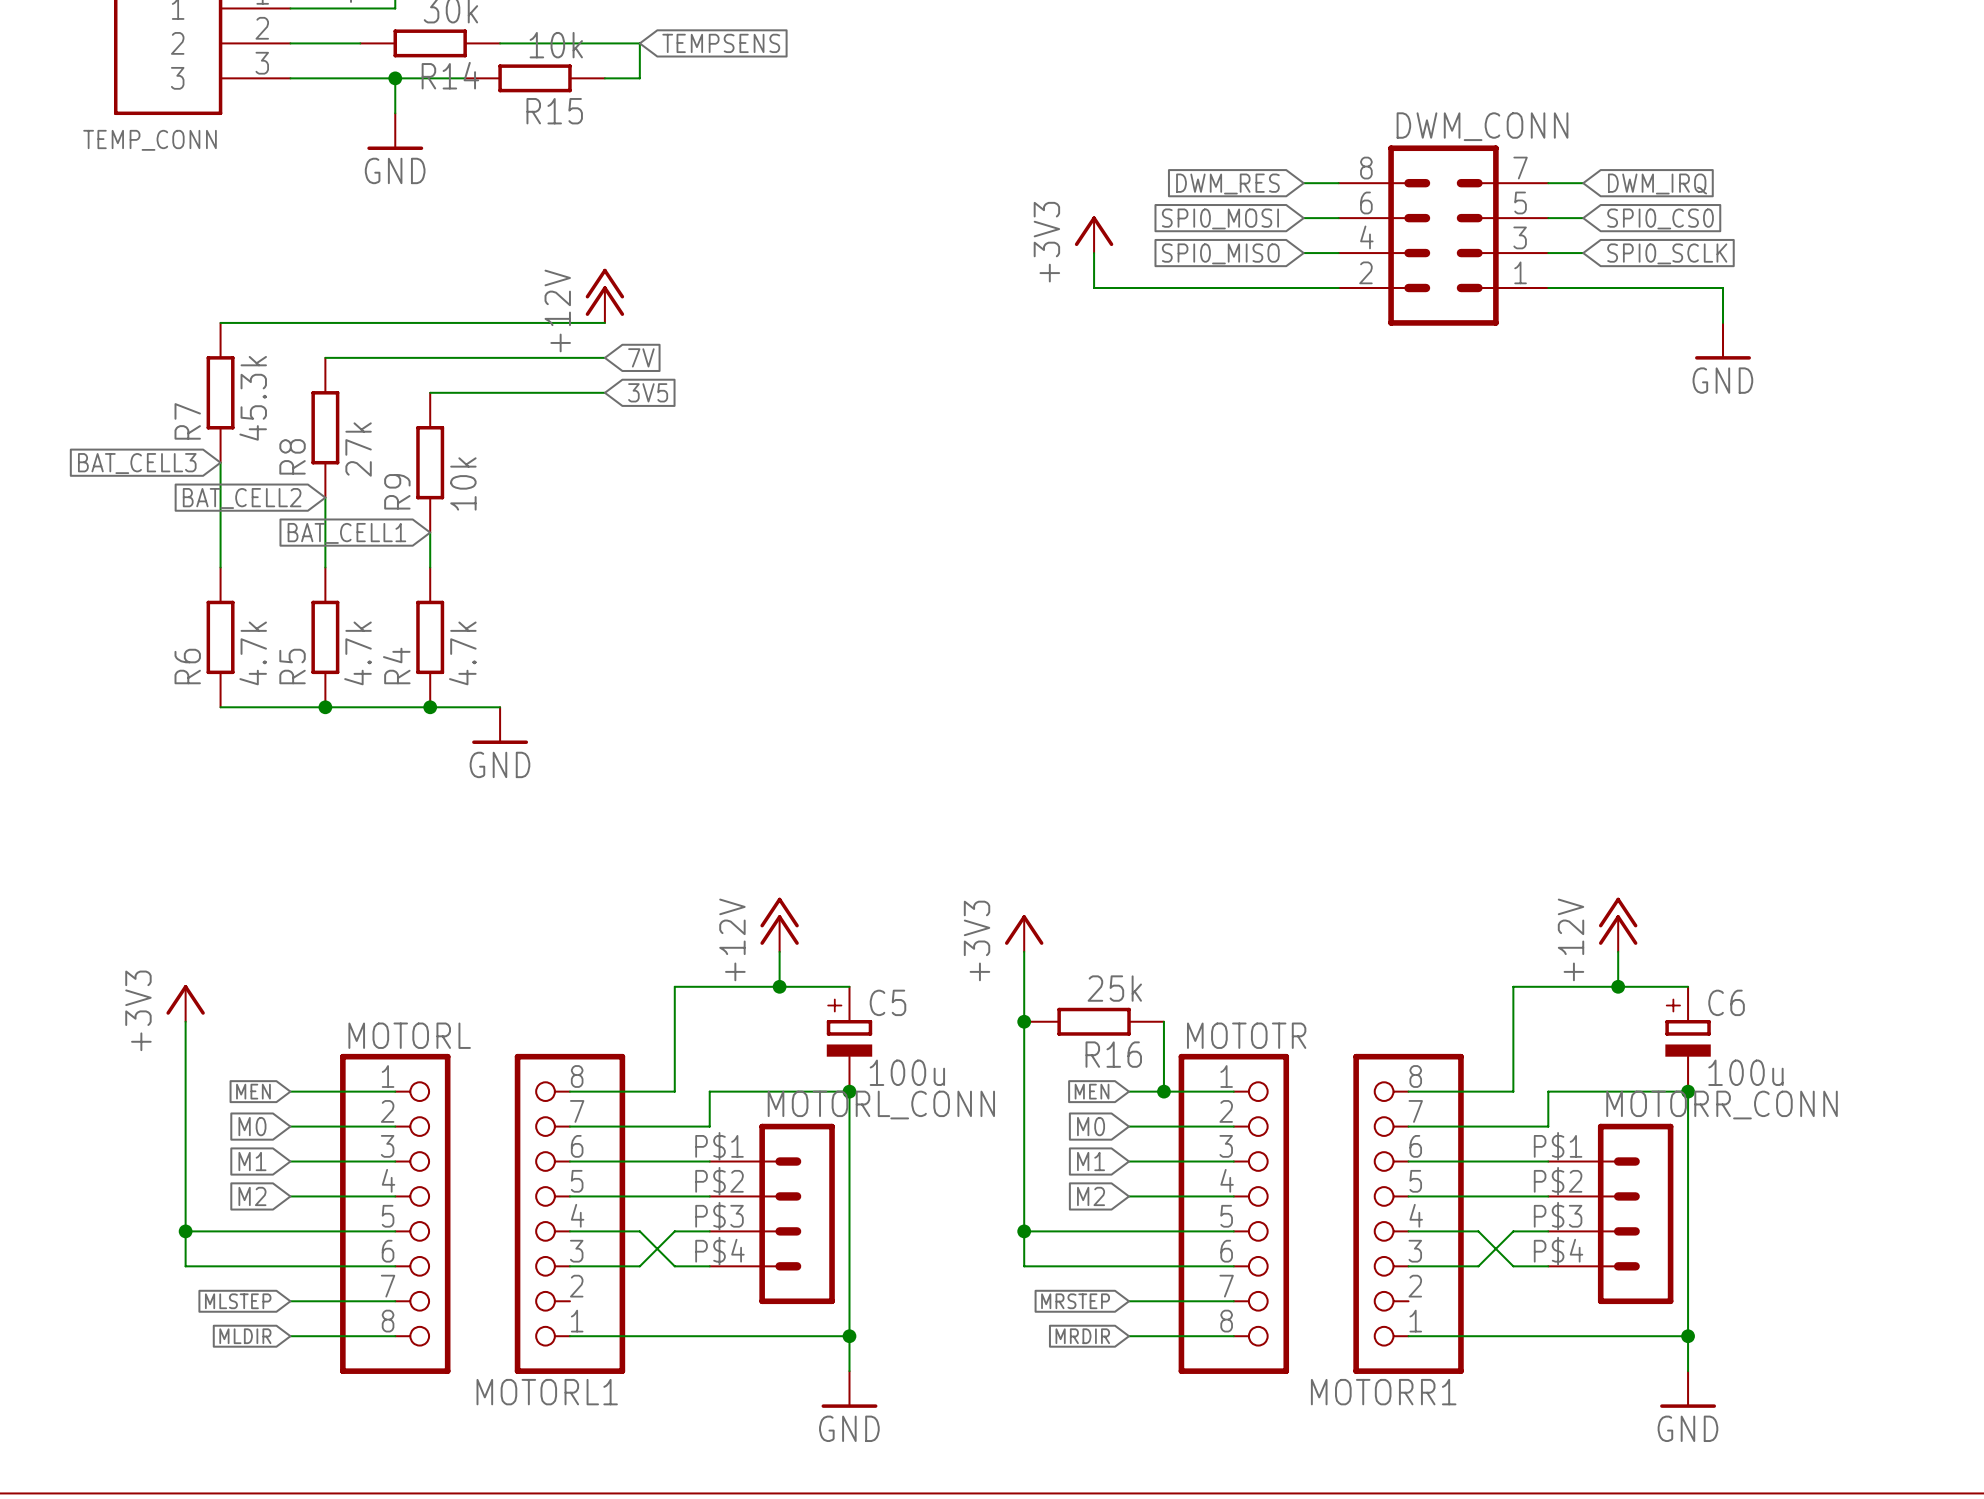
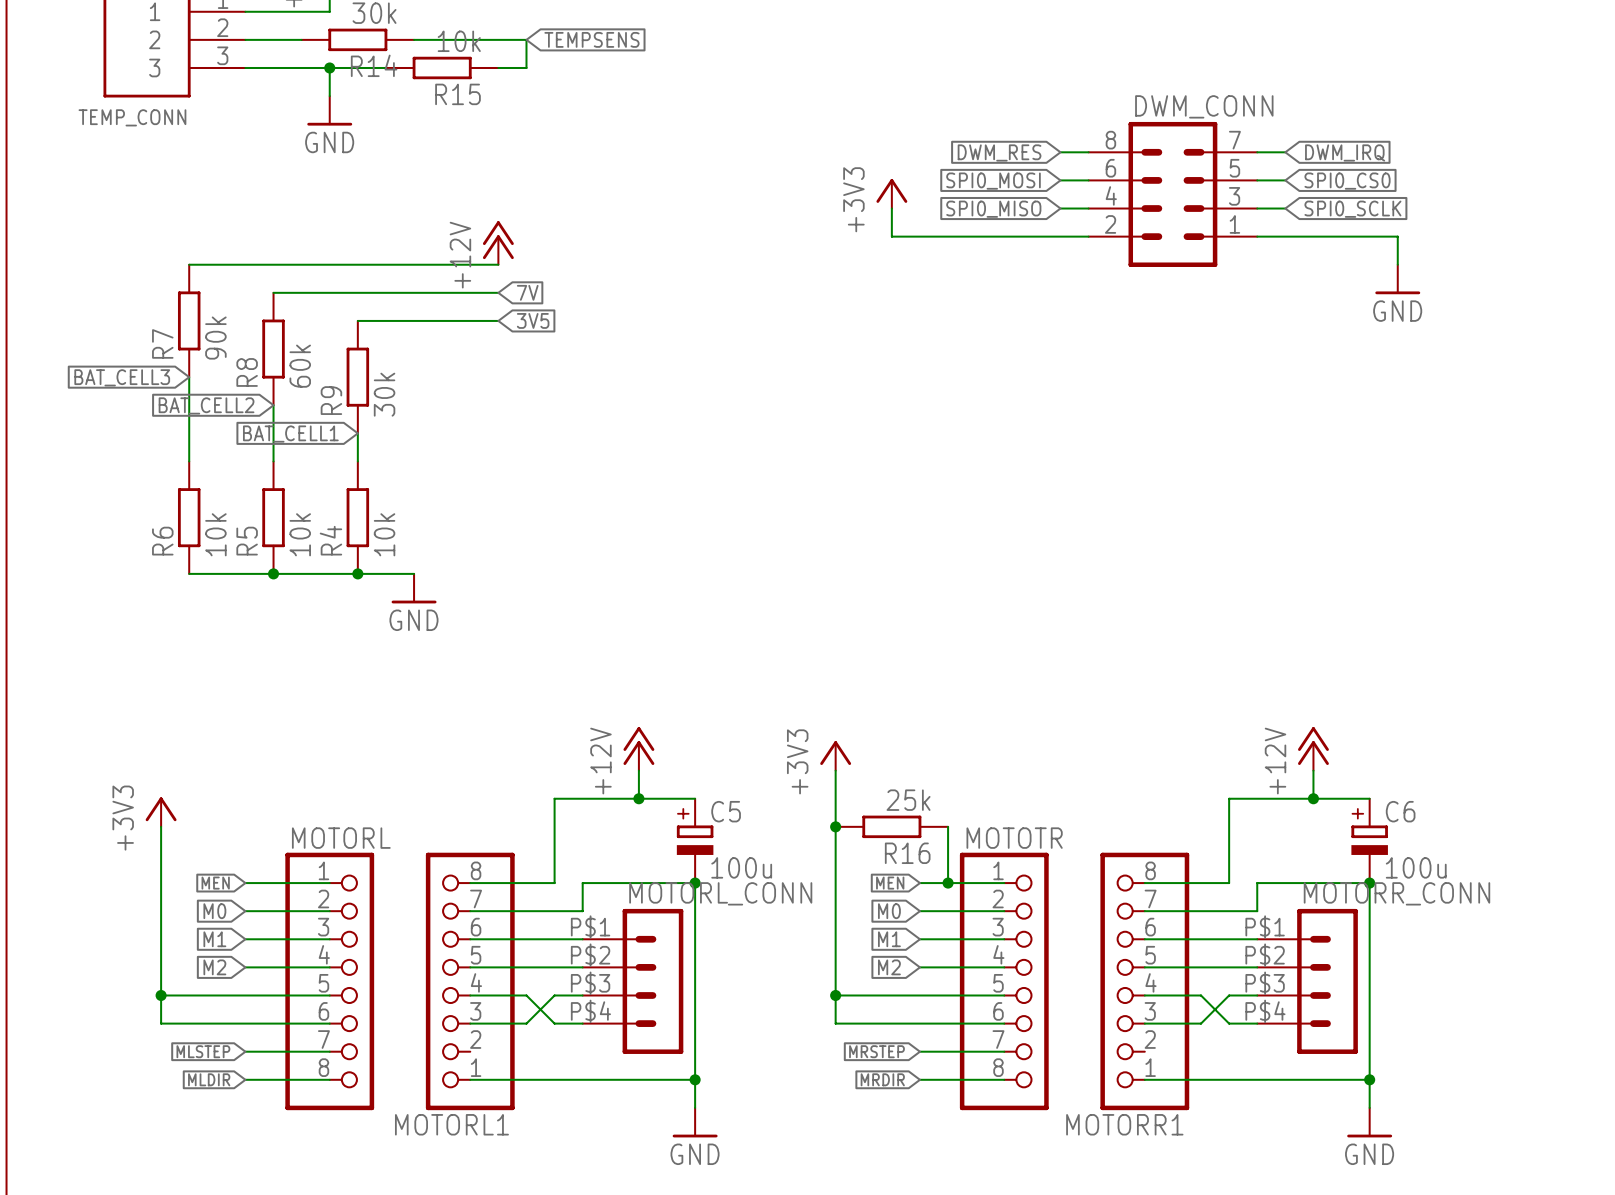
R7 value: 45.3k (253, 398) -> 90k (215, 338)
R8 value: 27k (358, 449) -> 60k (300, 366)
R9 value: 10k (463, 483) -> 30k (384, 394)
R6 value: 4.7k (253, 653) -> 10k (215, 534)
R5 value: 4.7k (357, 653) -> 10k (300, 534)
R4 value: 4.7k (462, 653) -> 10k (384, 534)

